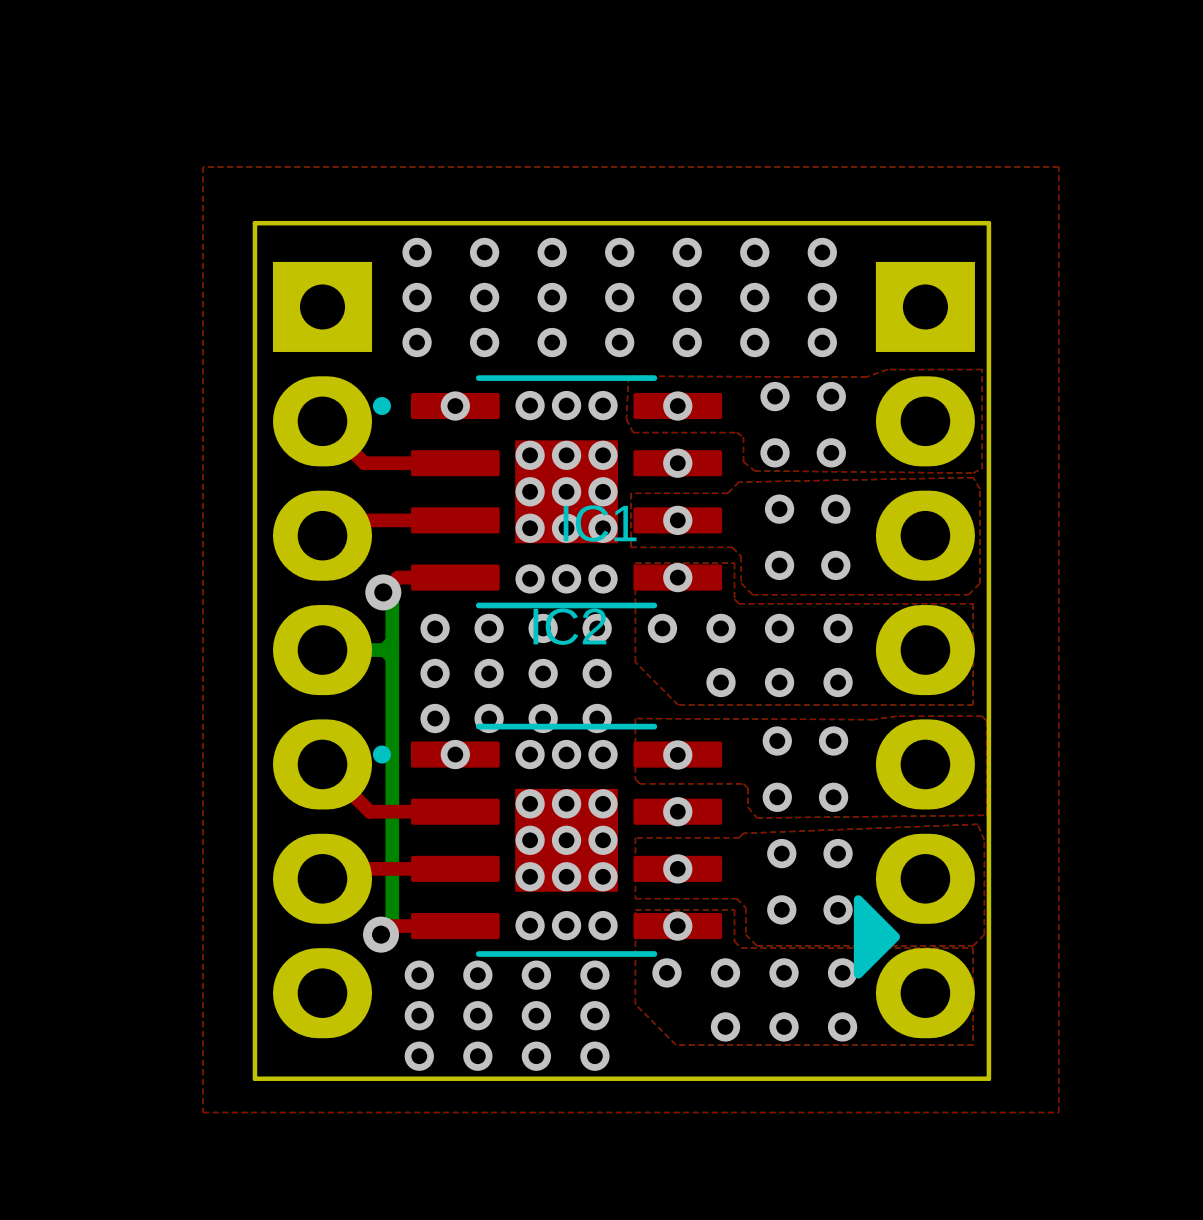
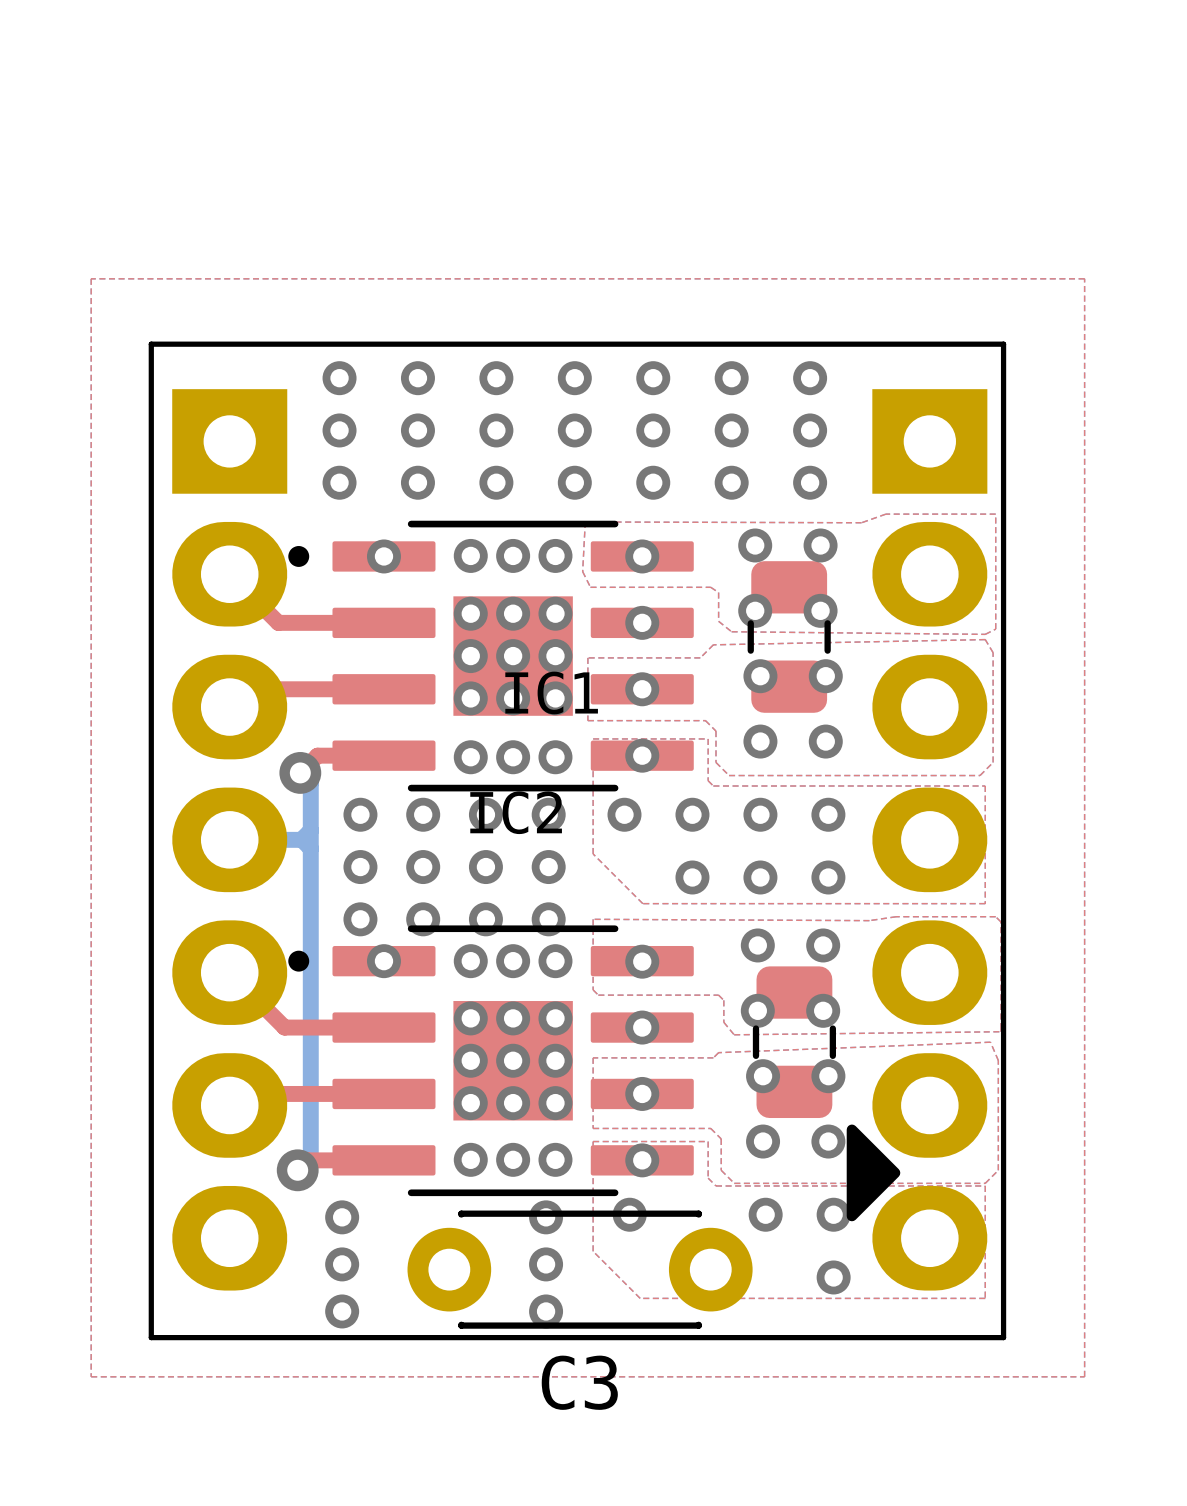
part: none -> (789, 636)
part: none -> (794, 1042)
via: (725, 972) -> none
via: (477, 975) -> none
via: (536, 975) -> none
via: (477, 1015) -> none
via: (536, 1015) -> none
C3: none -> (580, 1269)
via: (725, 1026) -> none
via: (784, 1026) -> none
via: (477, 1056) -> none
via: (536, 1056) -> none

